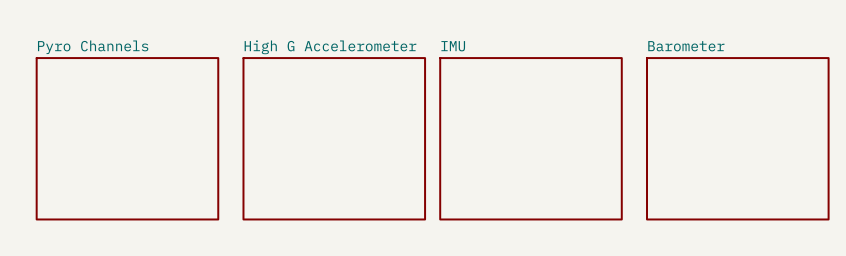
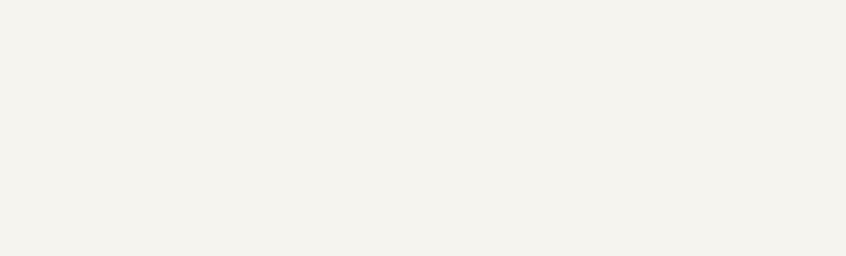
sheet Pyro Channels: (127, 138) -> none
sheet High G Accelerometer: (334, 138) -> none
sheet IMU: (530, 138) -> none
sheet Barometer: (737, 138) -> none

